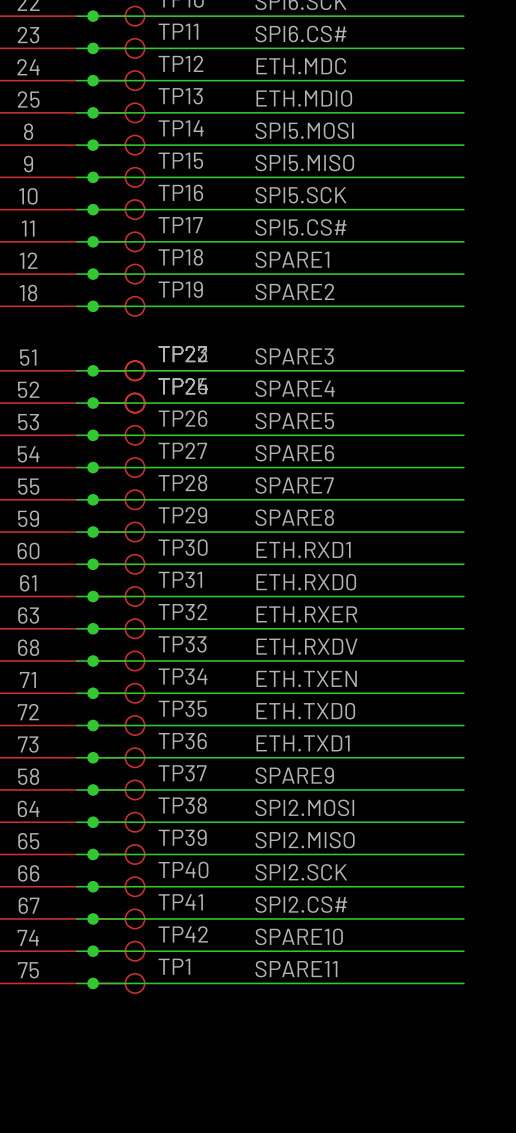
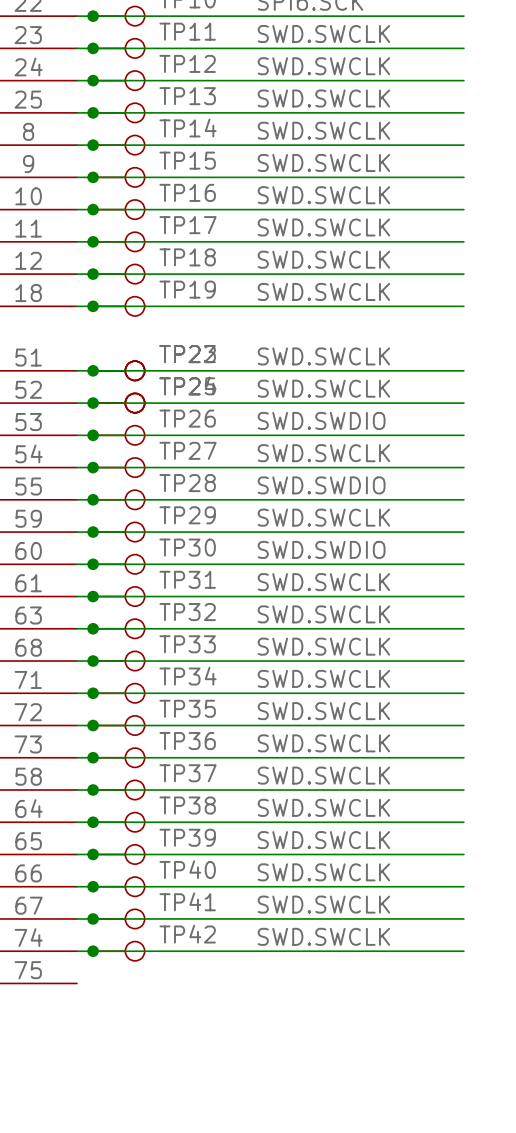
label: SPI6.CS# (301, 34) -> SWD.SWCLK (323, 34)
label: ETH.MDC (301, 66) -> SWD.SWCLK (323, 66)
label: ETH.MDIO (304, 98) -> SWD.SWCLK (323, 98)
label: SPI5.MOSI (304, 130) -> SWD.SWCLK (323, 130)
label: SPI5.MISO (304, 162) -> SWD.SWCLK (323, 162)
label: SPI5.SCK (300, 195) -> SWD.SWCLK (323, 195)
label: SPI5.CS# (301, 227) -> SWD.SWCLK (323, 227)
label: SPARE1 (292, 259) -> SWD.SWCLK (323, 259)
label: SPARE2 (294, 291) -> SWD.SWCLK (323, 291)
label: SPARE3 (294, 356) -> SWD.SWCLK (323, 356)
label: SPARE4 (295, 388) -> SWD.SWCLK (323, 388)
label: SPARE5 (294, 420) -> SWD.SWDIO (321, 420)
label: SPARE6 (294, 453) -> SWD.SWCLK (323, 453)
label: SPARE7 (294, 485) -> SWD.SWDIO (321, 485)
label: SPARE8 (294, 517) -> SWD.SWCLK (323, 517)
label: ETH.RXD1 (303, 549) -> SWD.SWDIO (321, 549)
label: ETH.RXD0 (306, 582) -> SWD.SWCLK (323, 582)
label: ETH.RXER (306, 614) -> SWD.SWCLK (323, 614)
label: ETH.RXDV (306, 646) -> SWD.SWCLK (323, 646)
label: ETH.TXEN (306, 678) -> SWD.SWCLK (323, 678)
label: ETH.TXD0 (305, 711) -> SWD.SWCLK (323, 711)
label: ETH.TXD1 (303, 743) -> SWD.SWCLK (323, 743)
label: SPARE9 (294, 775) -> SWD.SWCLK (323, 775)
label: SPI2.MOSI (304, 807) -> SWD.SWCLK (323, 807)
label: SPI2.MISO (305, 840) -> SWD.SWCLK (323, 840)
label: SPI2.SCK (301, 872) -> SWD.SWCLK (323, 872)
label: SPI2.CS# (301, 904) -> SWD.SWCLK (323, 904)
label: SPARE10 (299, 936) -> SWD.SWCLK (323, 936)
label: SPARE11 (296, 969) -> none
wire: (76, 983) (463, 983) -> none
junction: (93, 983) -> none
TP1: (118, 983) -> none

